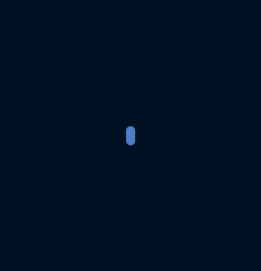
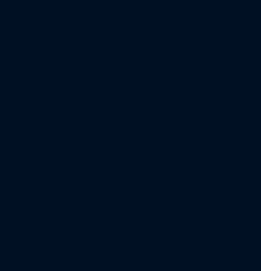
bottom track: (130, 130) (130, 140) -> none

